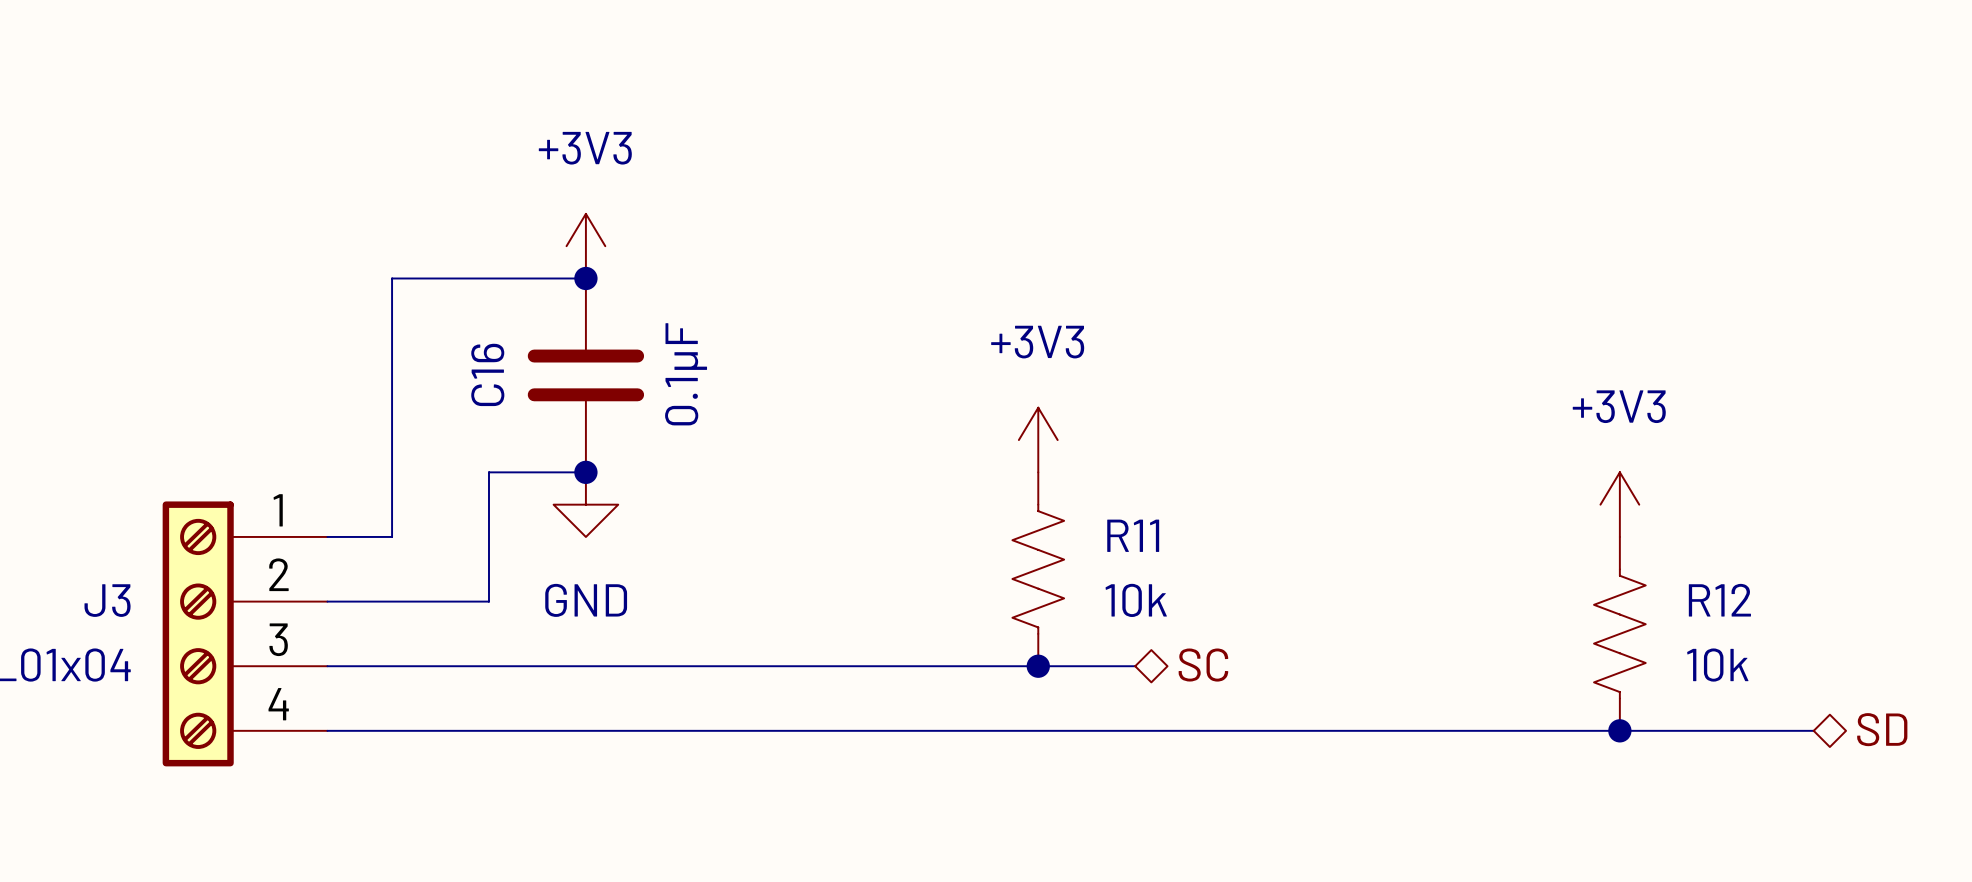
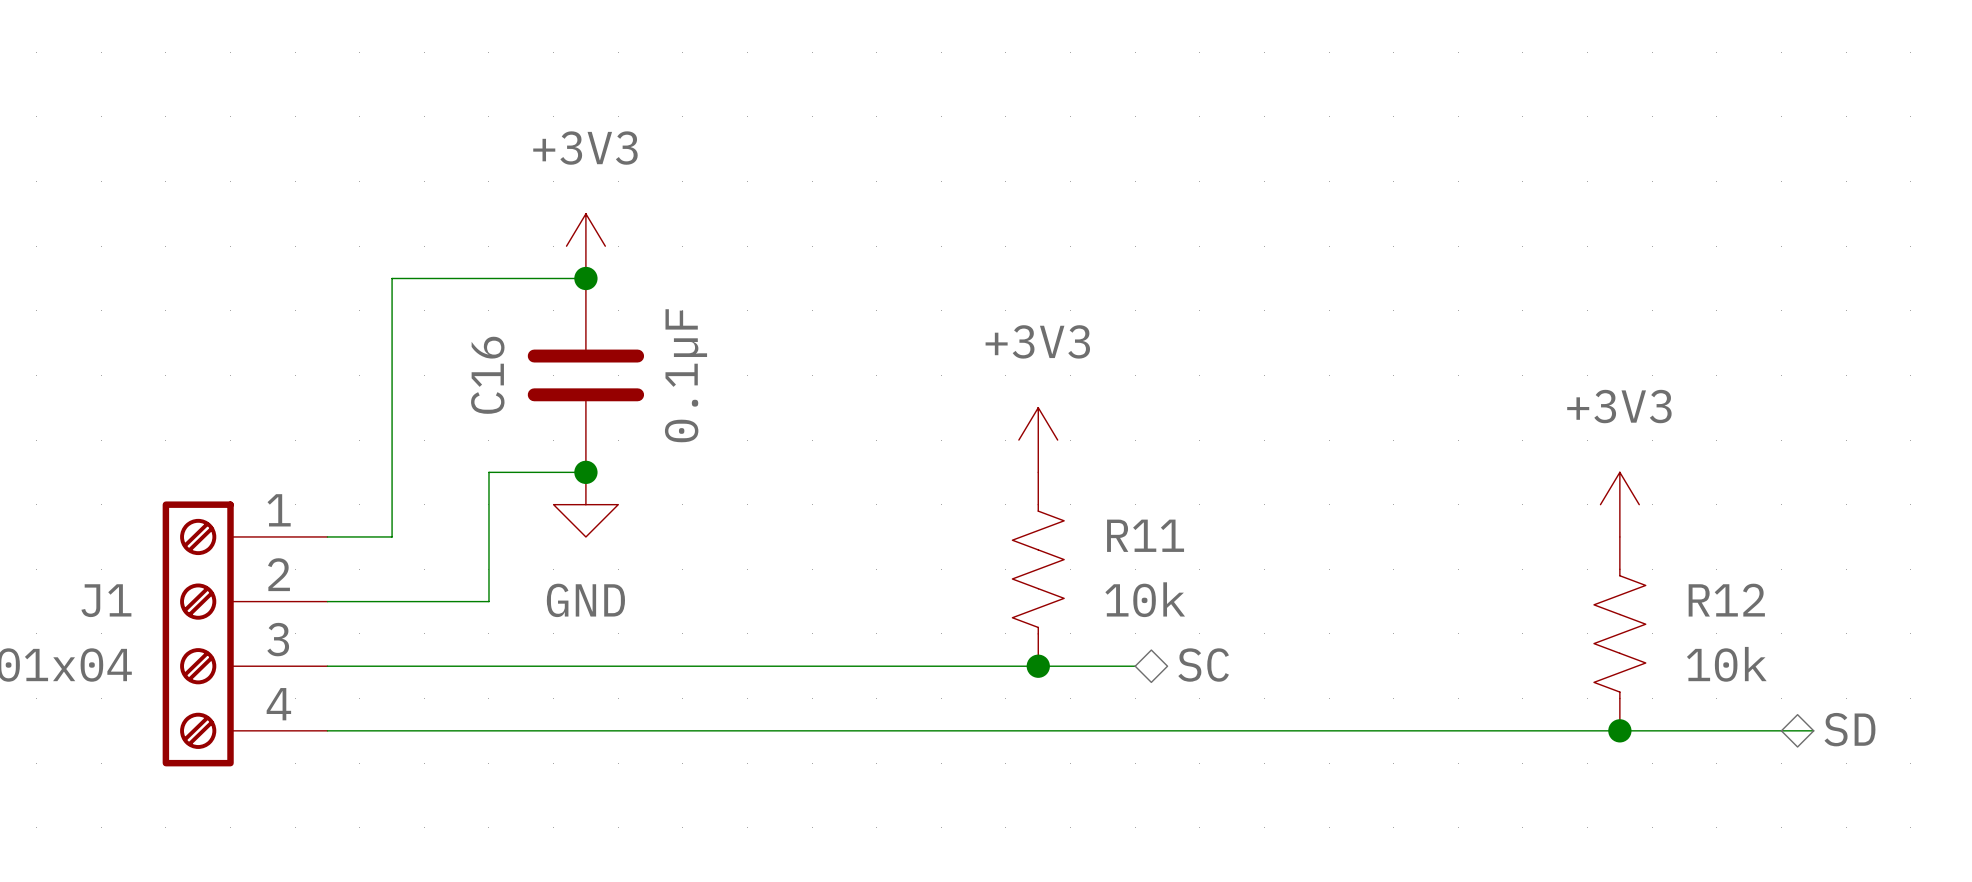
J3 name: J3 (107, 600) -> J1 (106, 600)
hierarchical label position: SD (1882, 729) -> SD (1849, 729)

